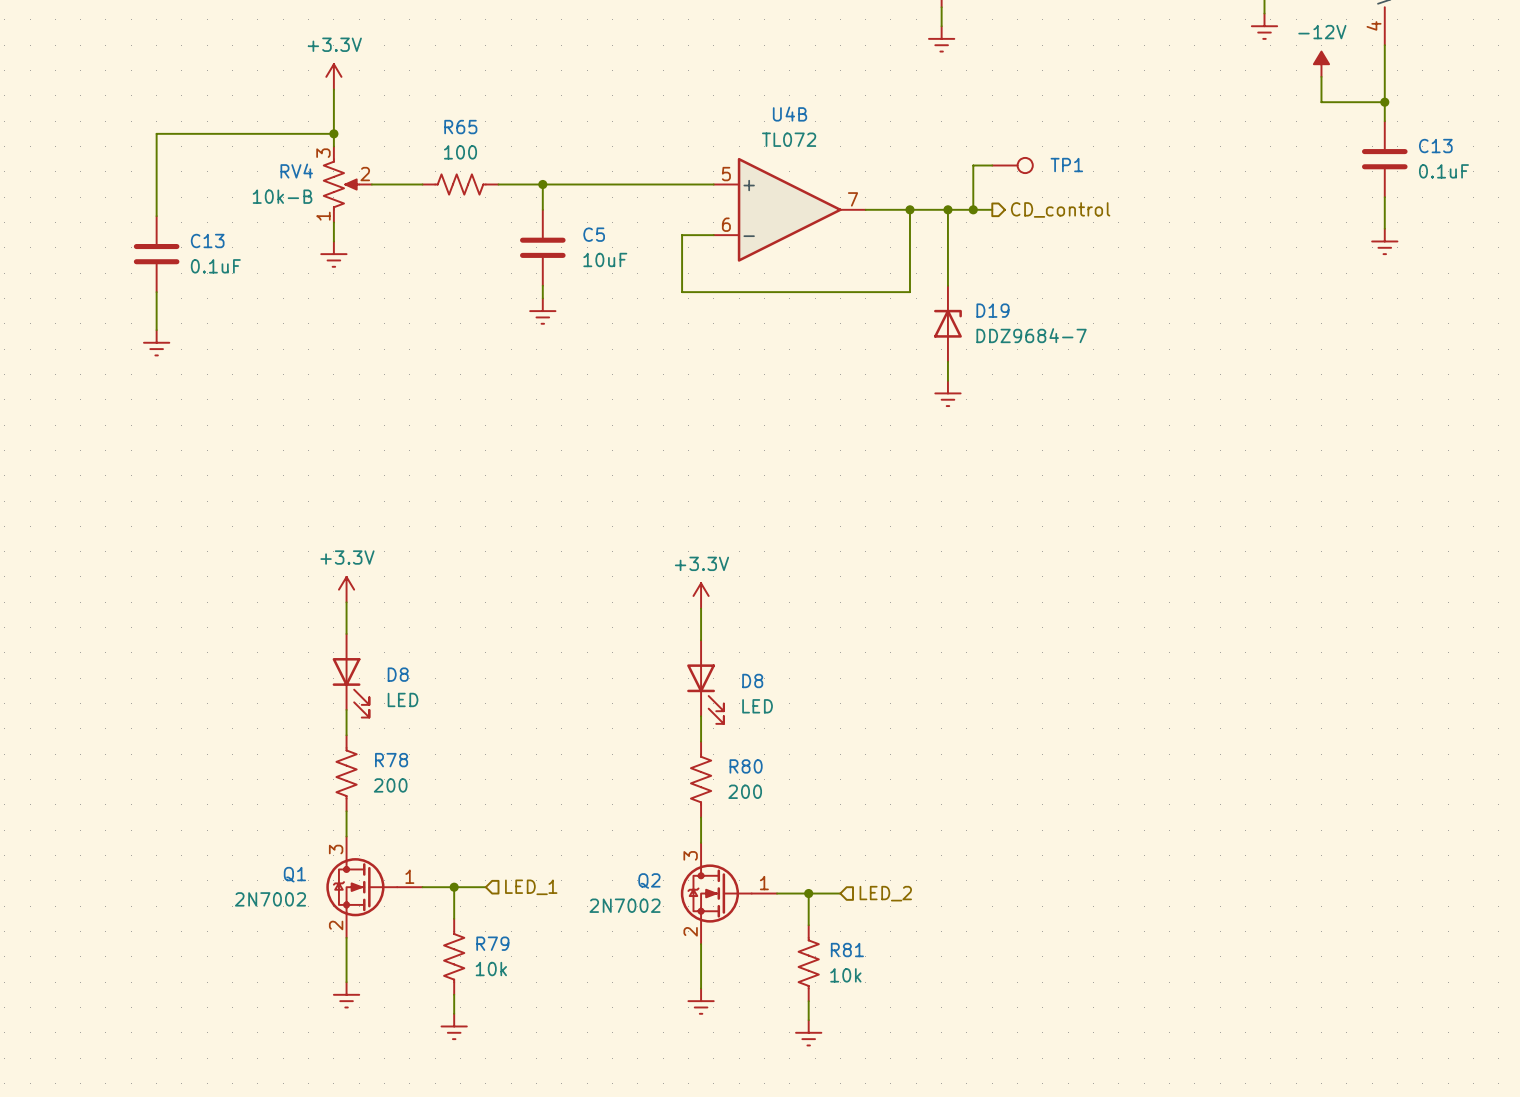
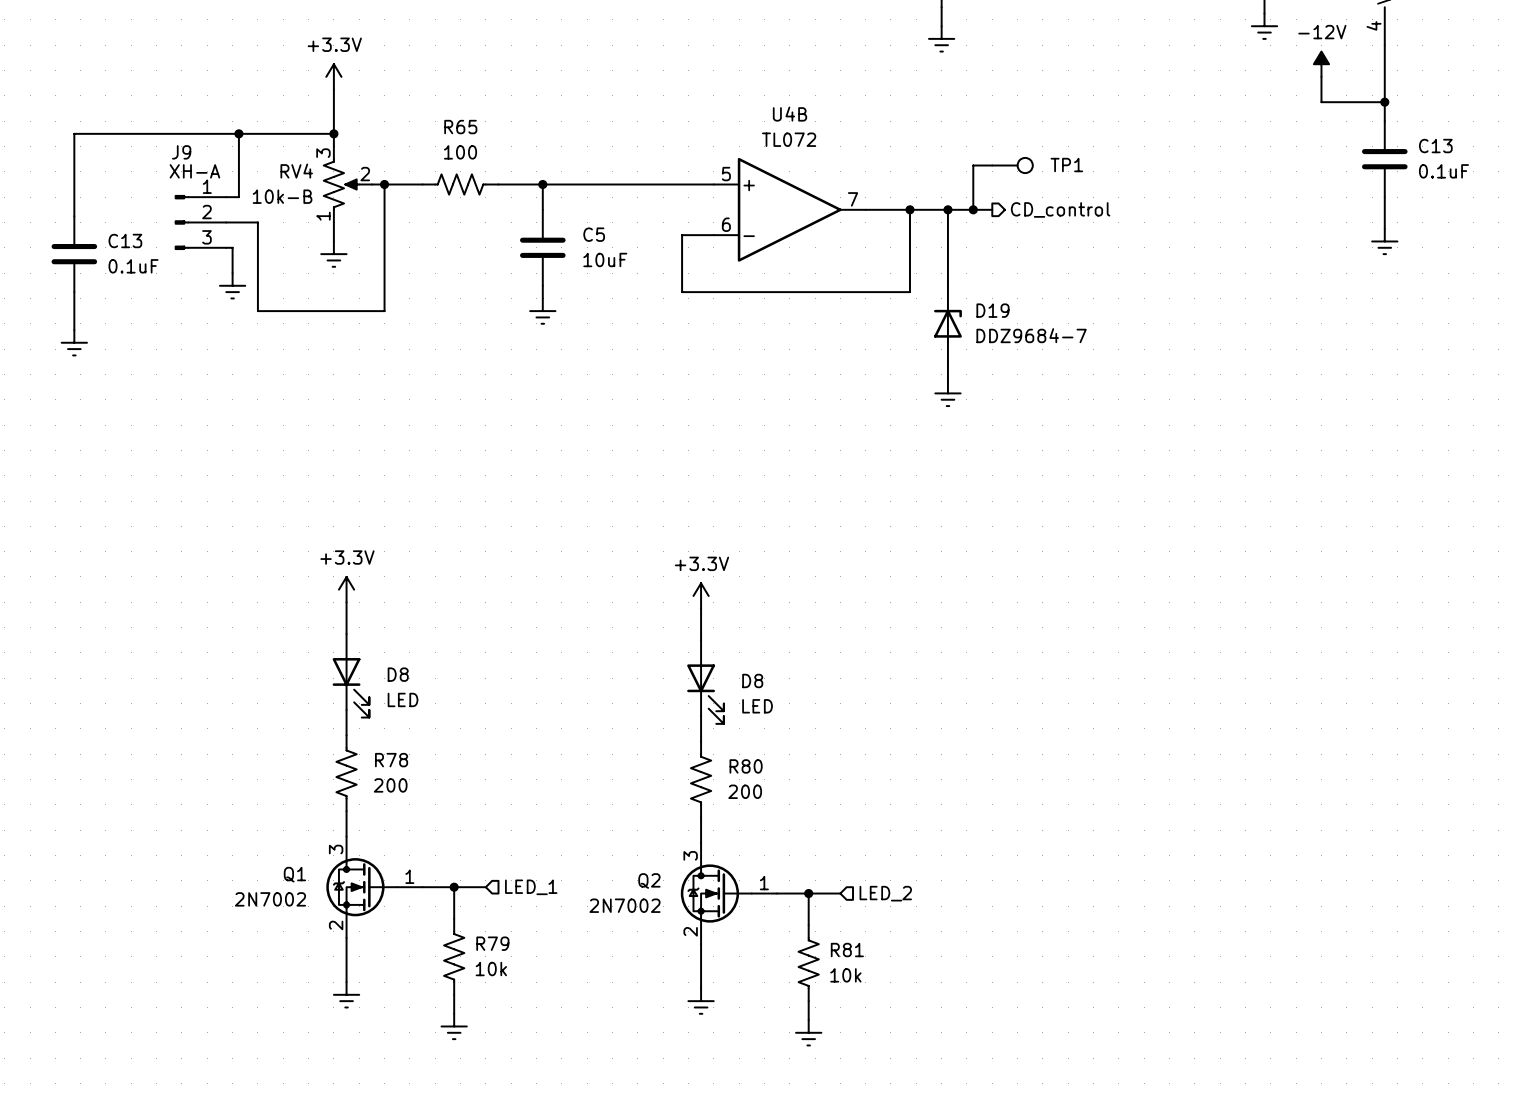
wire: (156, 133) (156, 216) -> (156, 133) (74, 133) (74, 216)
wire: none -> (238, 133) (238, 197) (226, 197)
junction: none -> (238, 133)
wire: none -> (384, 184) (384, 311) (257, 311) (257, 222) (226, 222)
junction: none -> (384, 184)
J9: none -> XH-A (200, 222)
wire: none -> (226, 247) (232, 247) (232, 273)
C13 position: (156, 254) -> (74, 254)
power symbol: none -> (232, 285)
wire: (156, 292) (156, 330) -> (74, 292) (74, 330)
power symbol: none -> (74, 342)
power symbol: (156, 342) -> none

